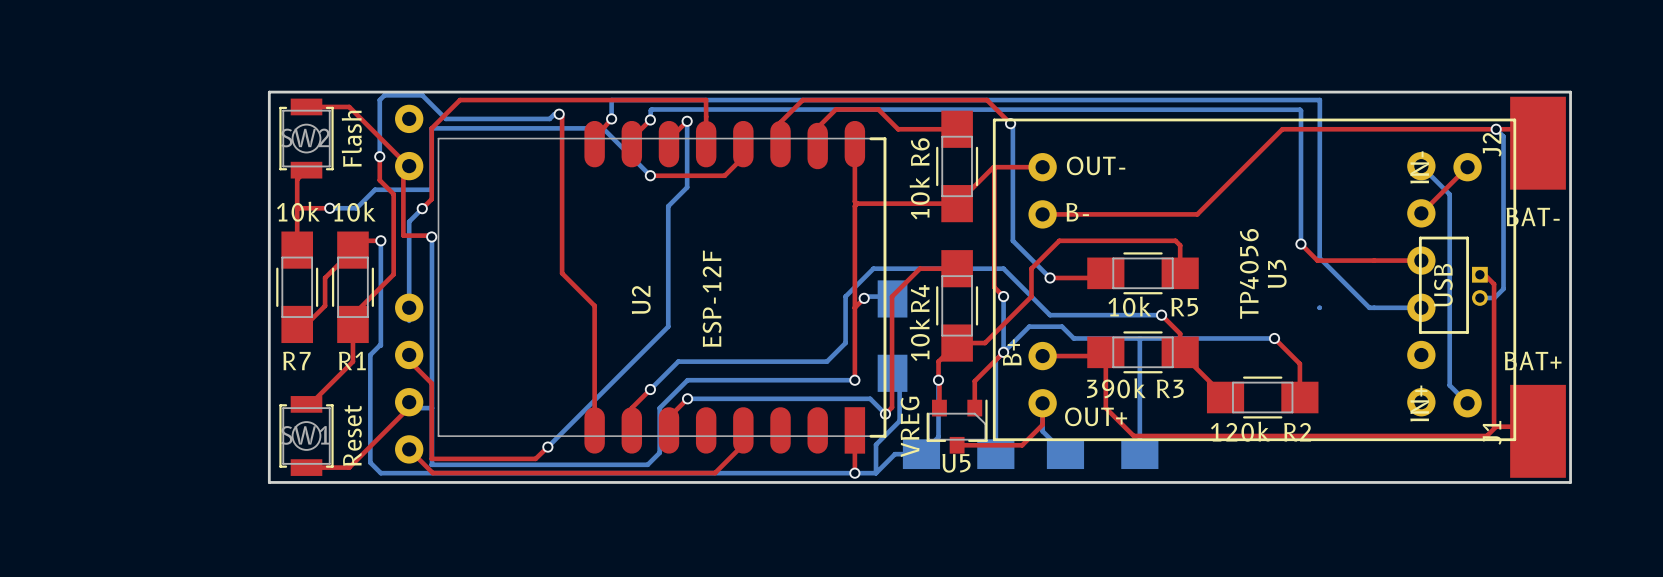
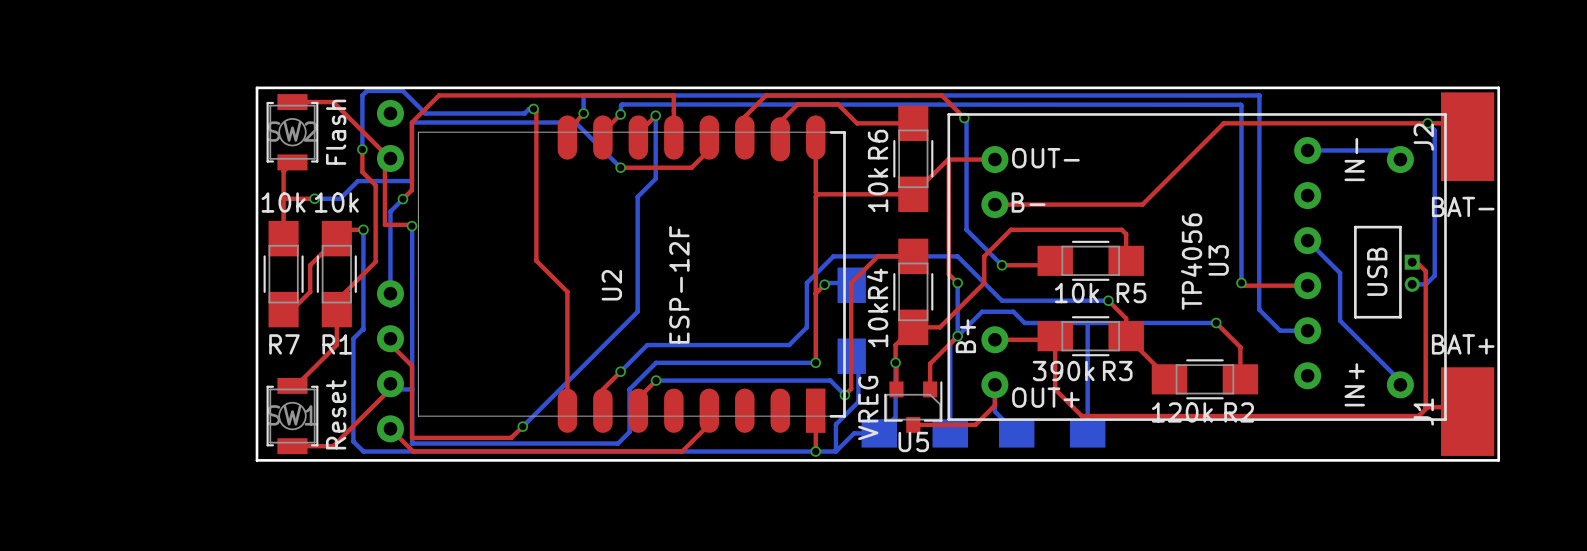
bottom track: (1301, 110) (1300, 244) -> (1241, 105) (1241, 283)
bottom track: none -> (1307, 150) (1391, 150) (1400, 159)
bottom track: (1421, 166) (1449, 194) (1449, 385) (1467, 403) -> (1307, 240) (1340, 273) (1340, 320) (1400, 381) (1400, 384)
top track: (1467, 167) (1421, 213) -> none
top track: (1300, 244) (1317, 260) (1421, 260) -> none
via position: (1300, 244) -> (1241, 283)
bottom track: (1319, 258) (1369, 307) (1421, 307) -> (1259, 246) (1259, 309) (1280, 330) (1307, 330)
part position: (1421, 284) -> (1307, 263)
top track: none -> (1241, 283) (1244, 285) (1307, 285)

